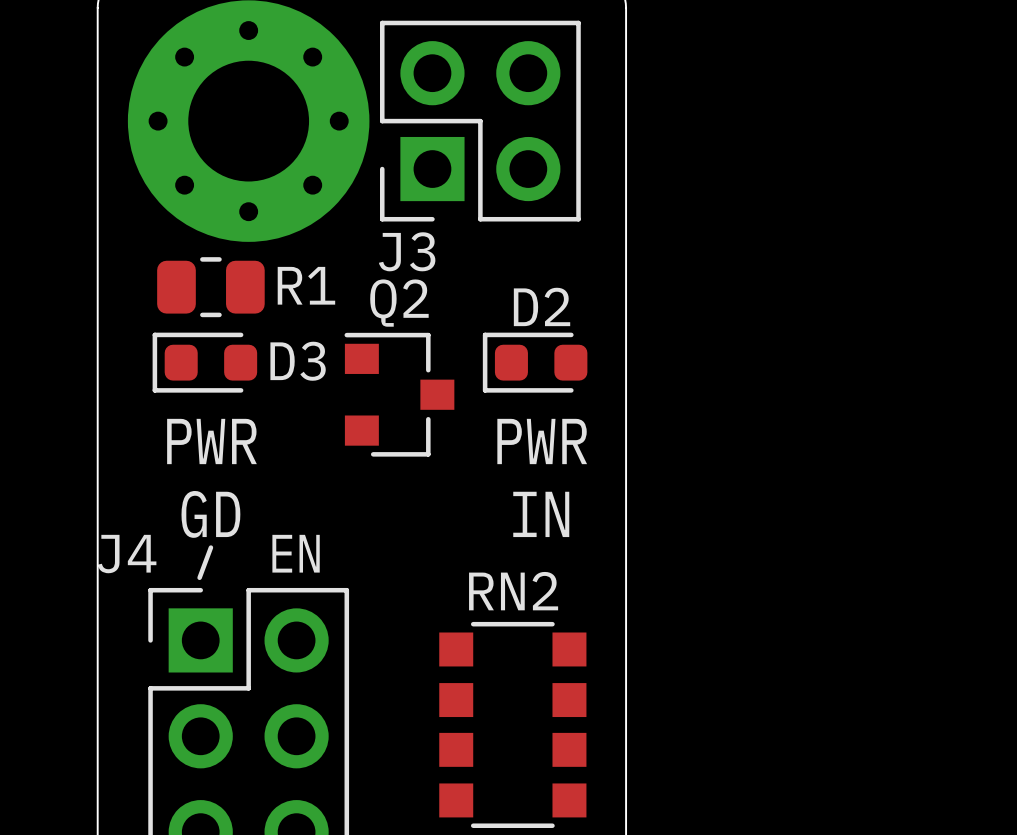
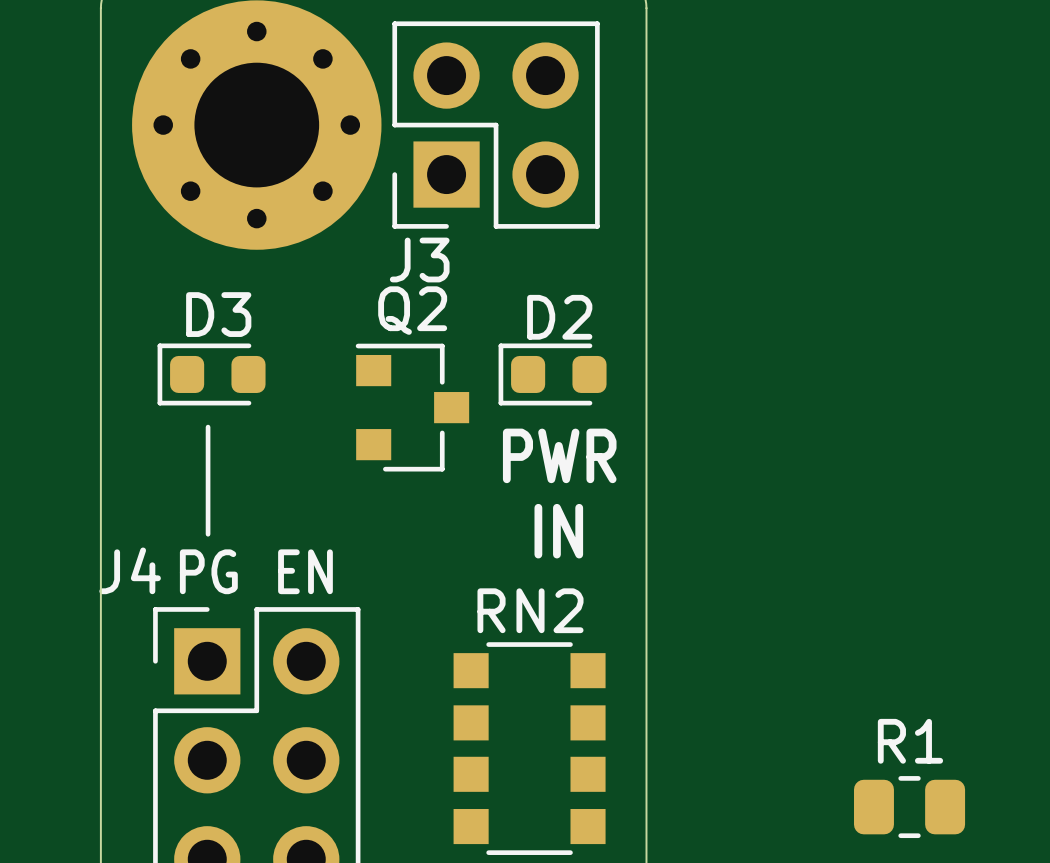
R1 name position: R1 (306, 285) -> R1 (910, 741)
R1 position: (210, 287) -> (909, 807)
D3 name position: D3 (298, 361) -> D3 (218, 314)
line: none -> (208, 427) (208, 534)
text: PWR (211, 441) -> none
text: GD (210, 514) -> none
line: (210, 547) (199, 577) -> none
text: none -> PG (208, 571)

